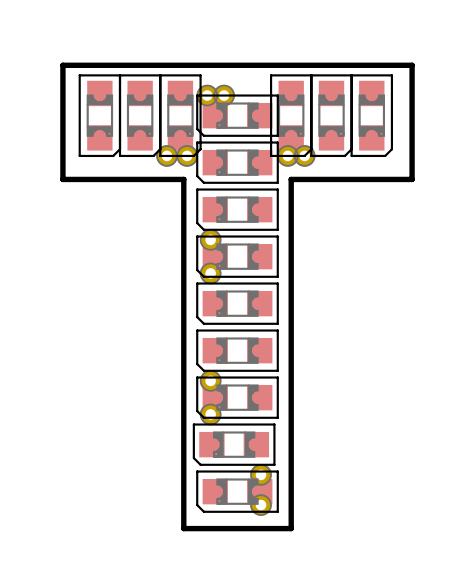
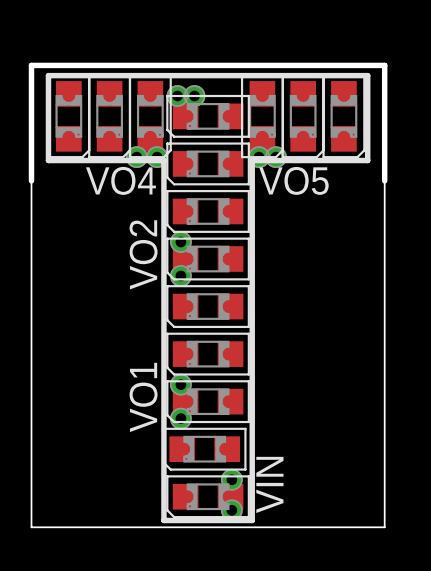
line: none -> (48, 75) (48, 160) (163, 160) (163, 520) (252, 520) (252, 160) (367, 160) (367, 75) (48, 75)
VO4 name: none -> VO4 (120, 180)
board edge: (62, 179) (183, 179) (183, 528) (291, 528) (291, 179) (412, 179) -> (31, 180) (31, 527) (384, 527) (384, 180)
VO5 name: none -> VO5 (293, 180)
VO2 name: none -> VO2 (143, 254)
VO1 name: none -> VO1 (143, 397)
VIN name: none -> VIN (269, 484)

